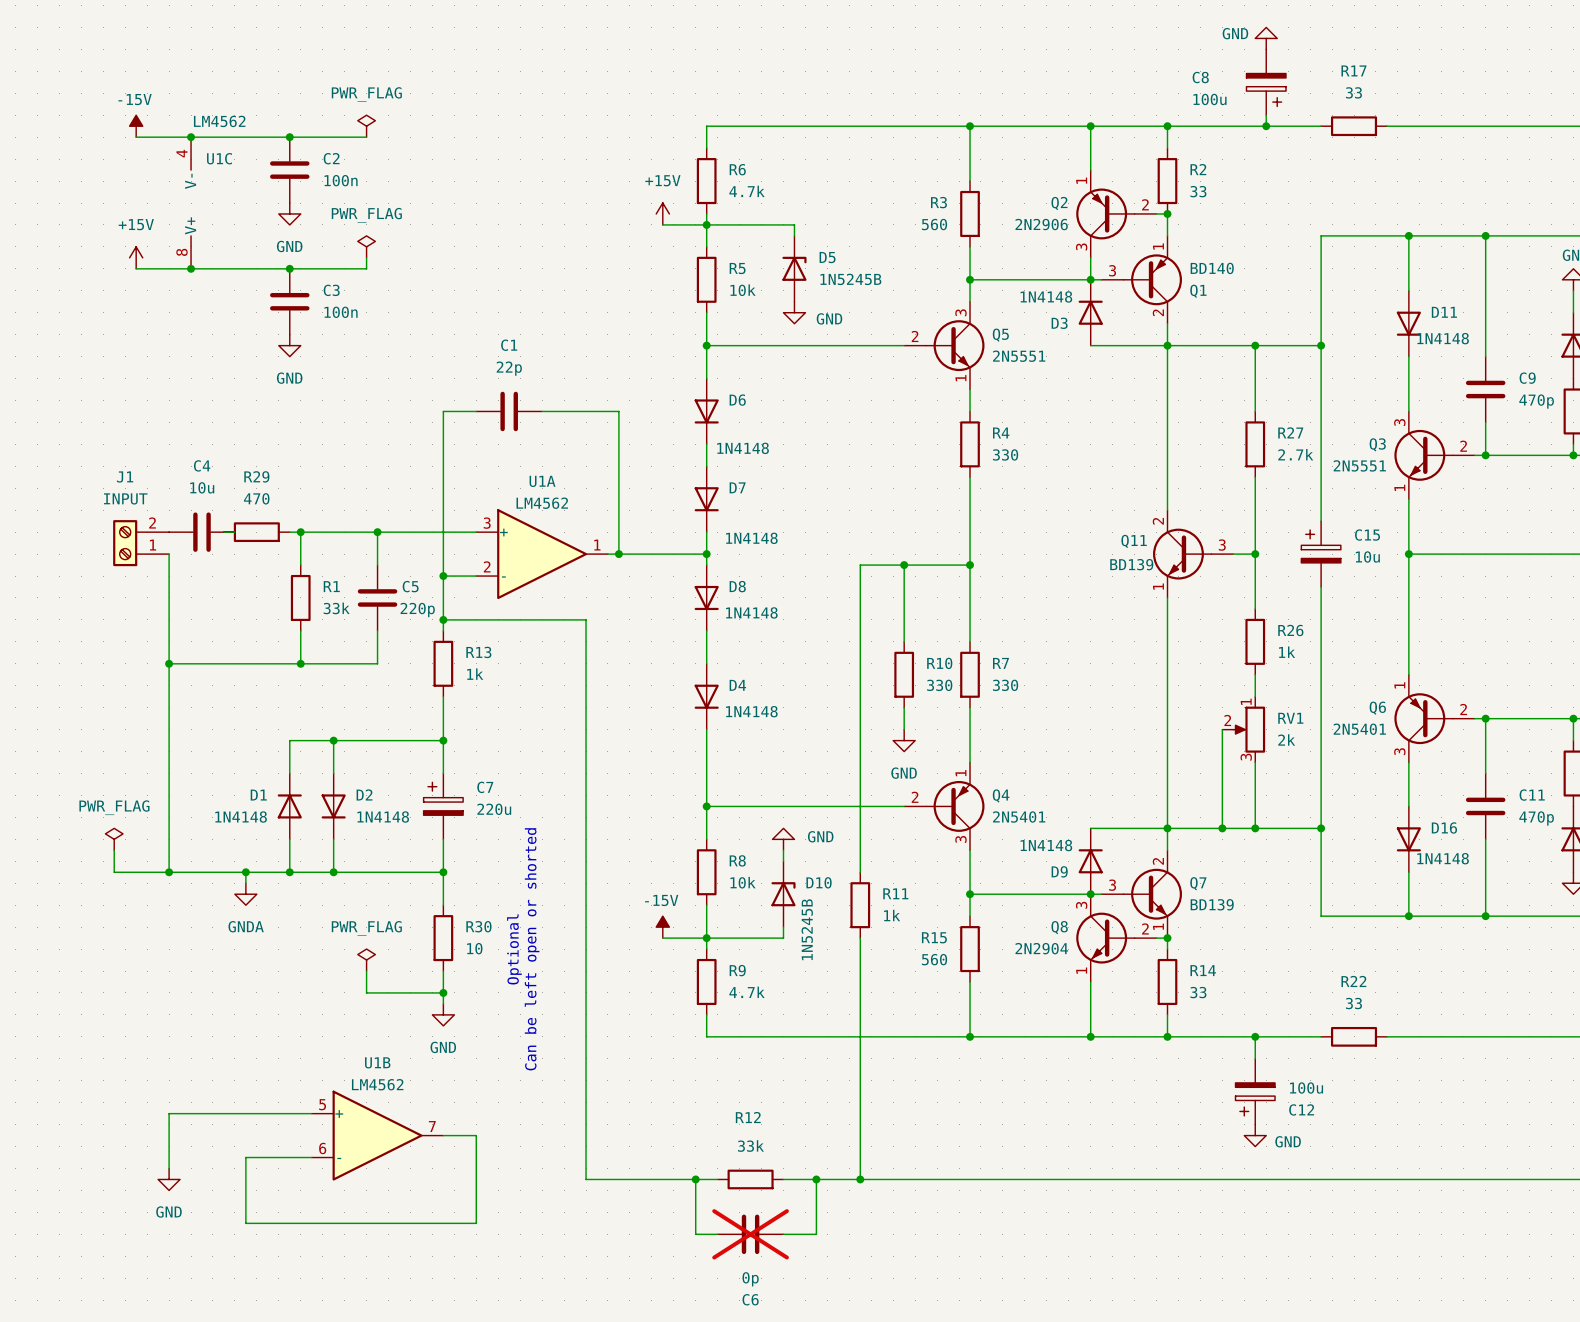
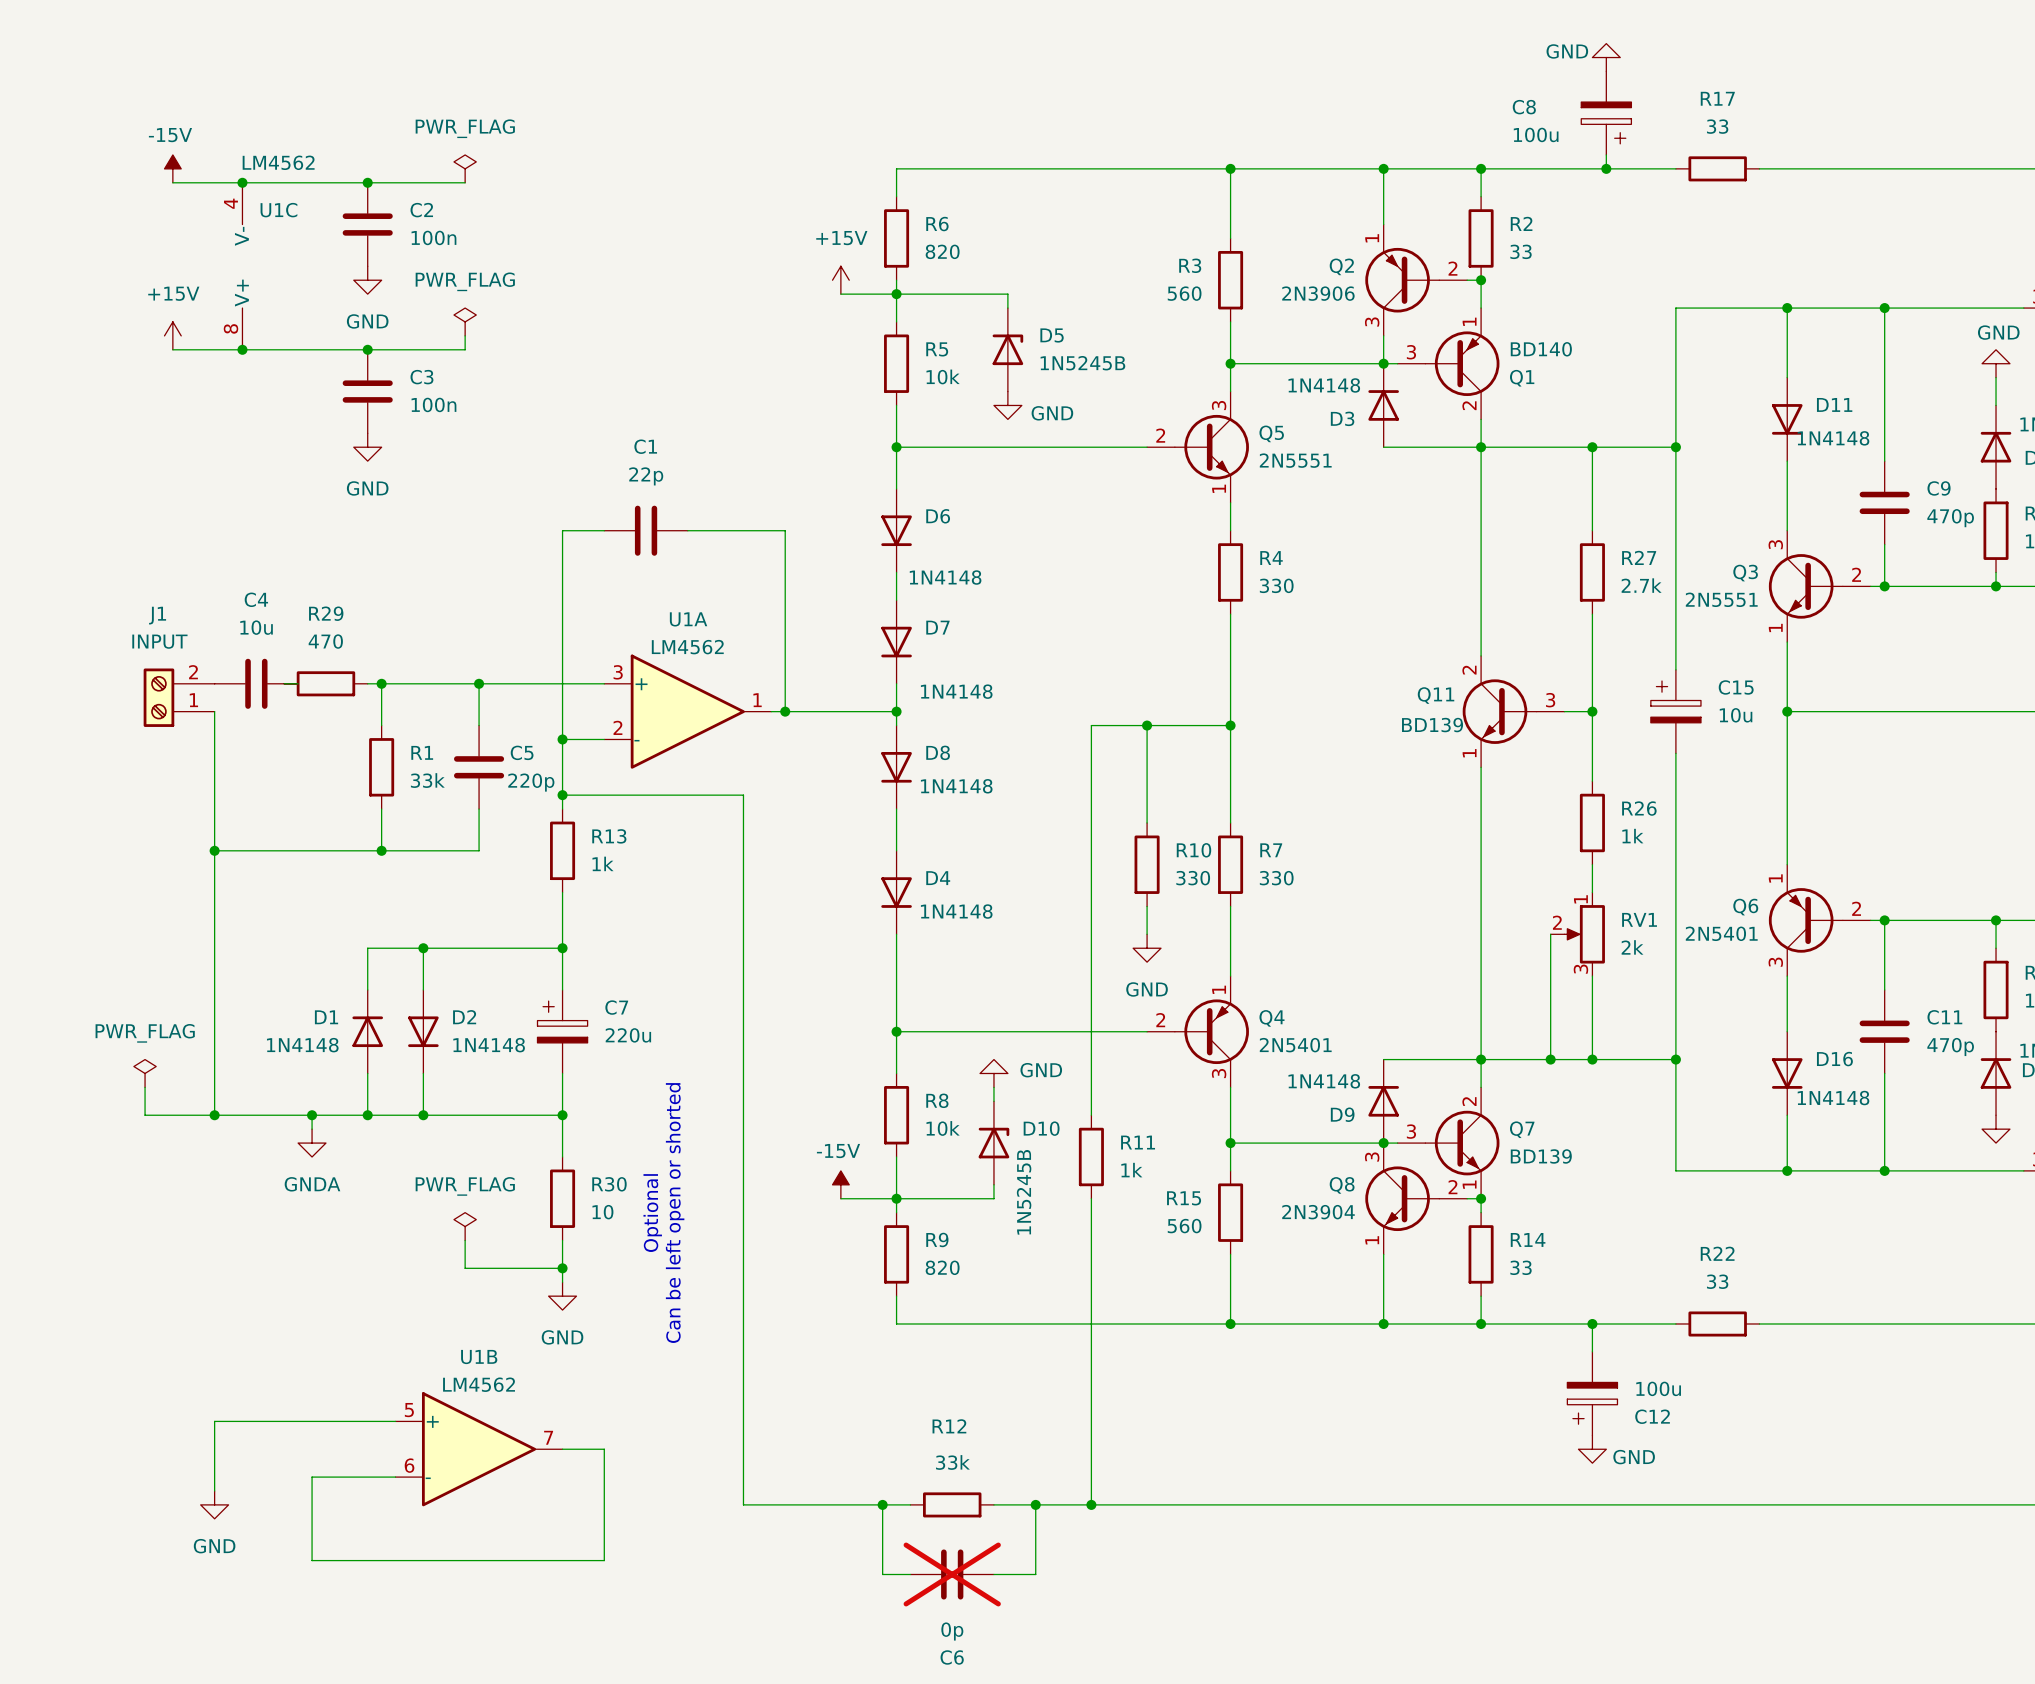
R6 value: 4.7k (747, 191) -> 820 (942, 251)
Q2 value: 2N2906 (1041, 224) -> 2N3906 (1318, 293)
Q8 value: 2N2904 (1041, 948) -> 2N3904 (1318, 1212)
R9 value: 4.7k (747, 992) -> 820 (942, 1267)

